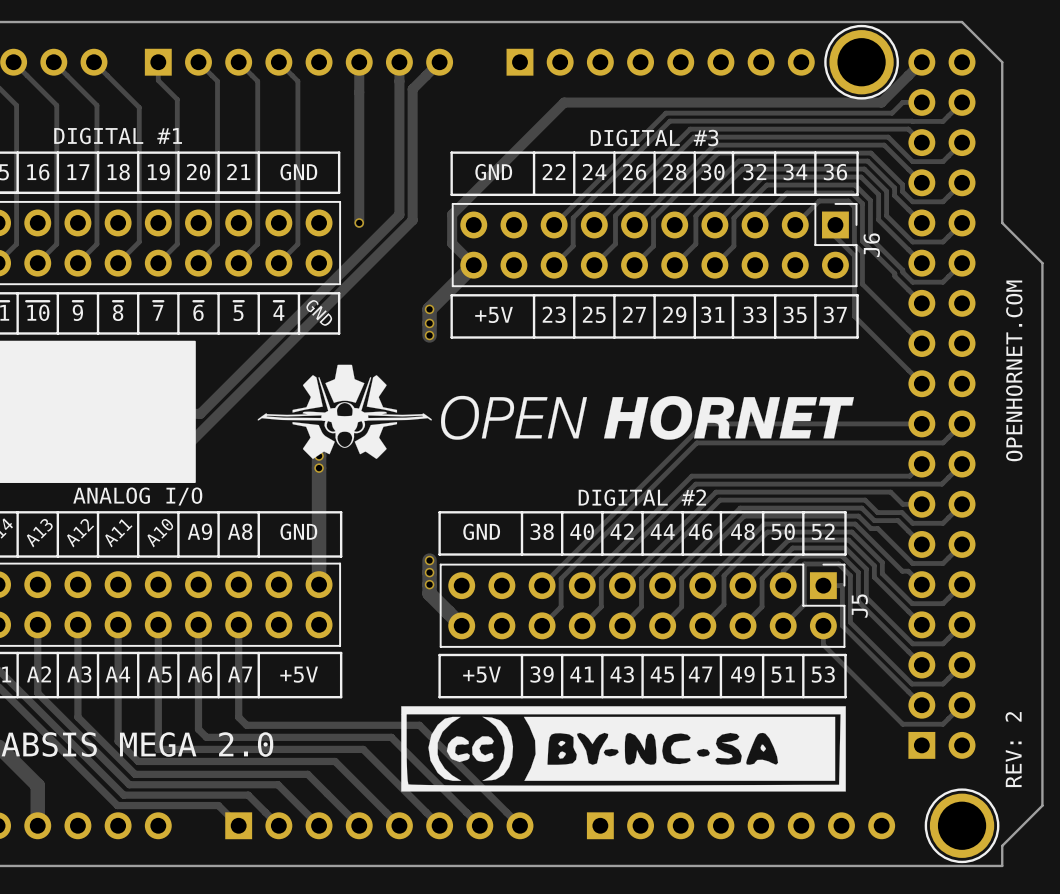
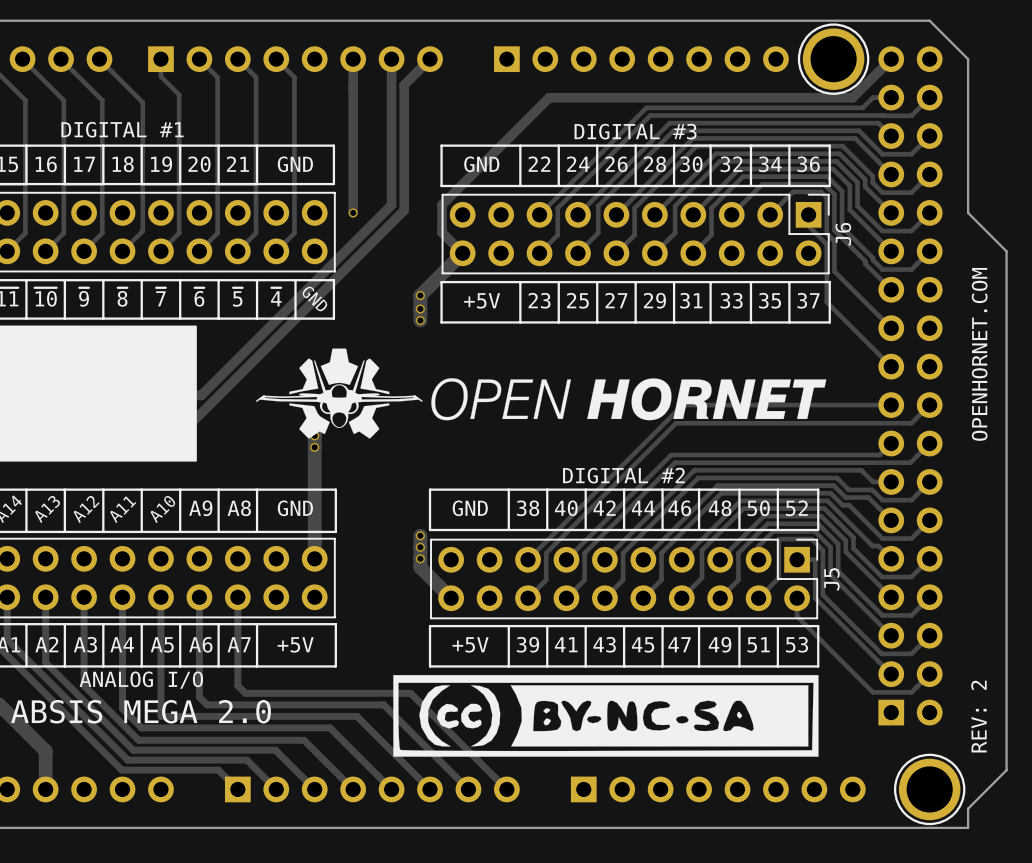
part value position: ANALOG I/O (137, 496) -> ANALOG I/O (141, 680)

